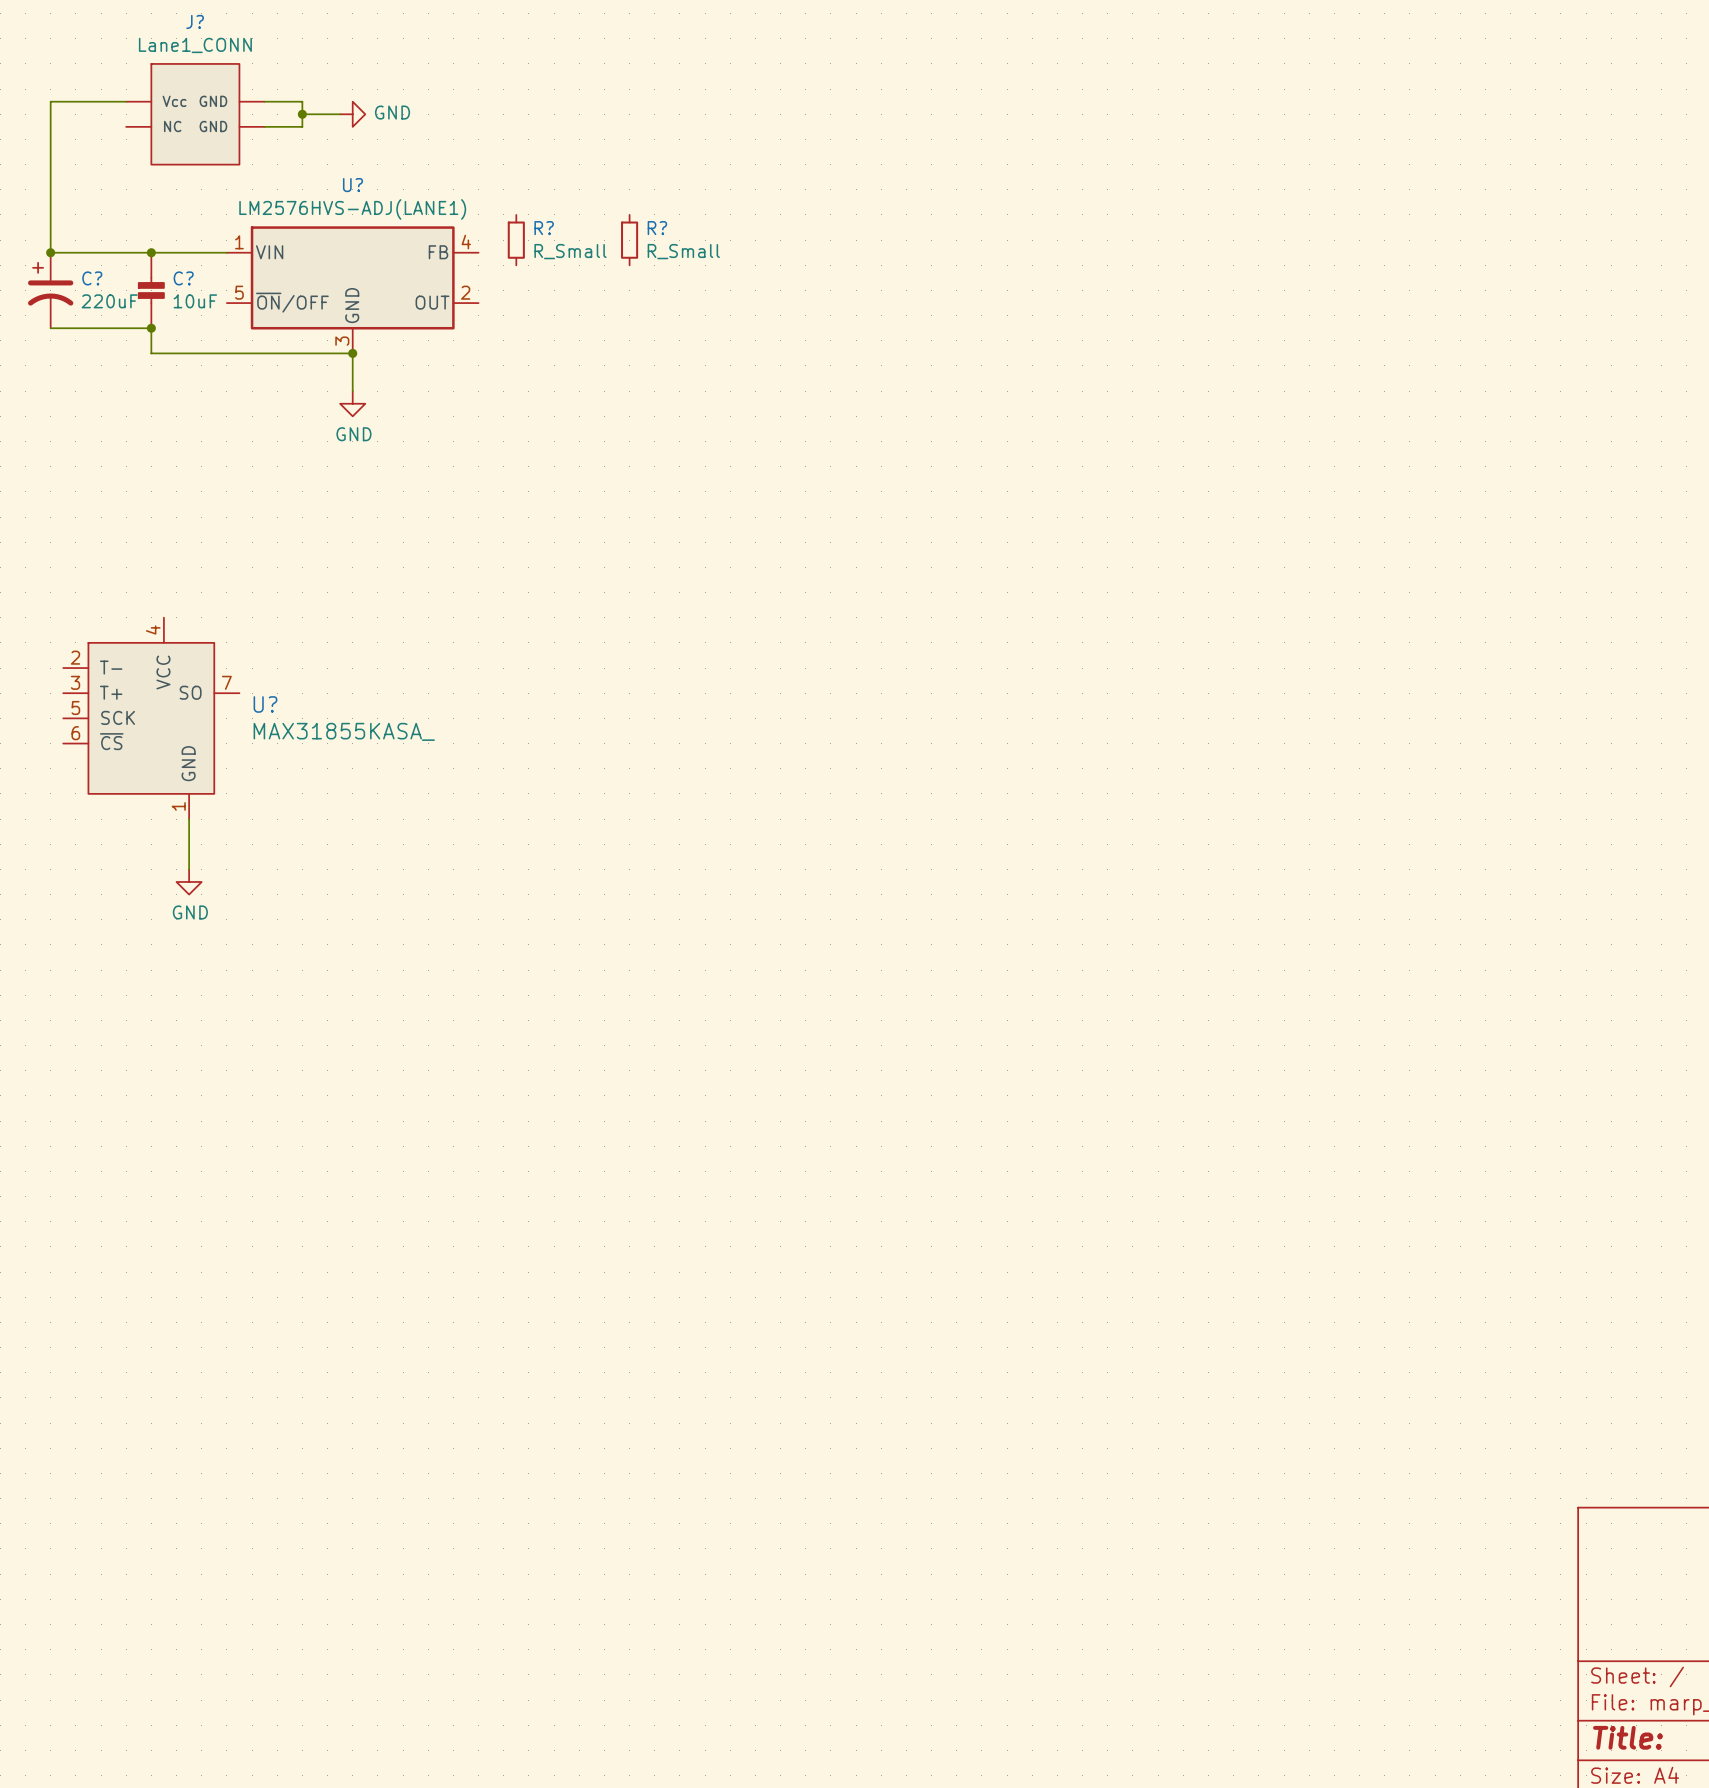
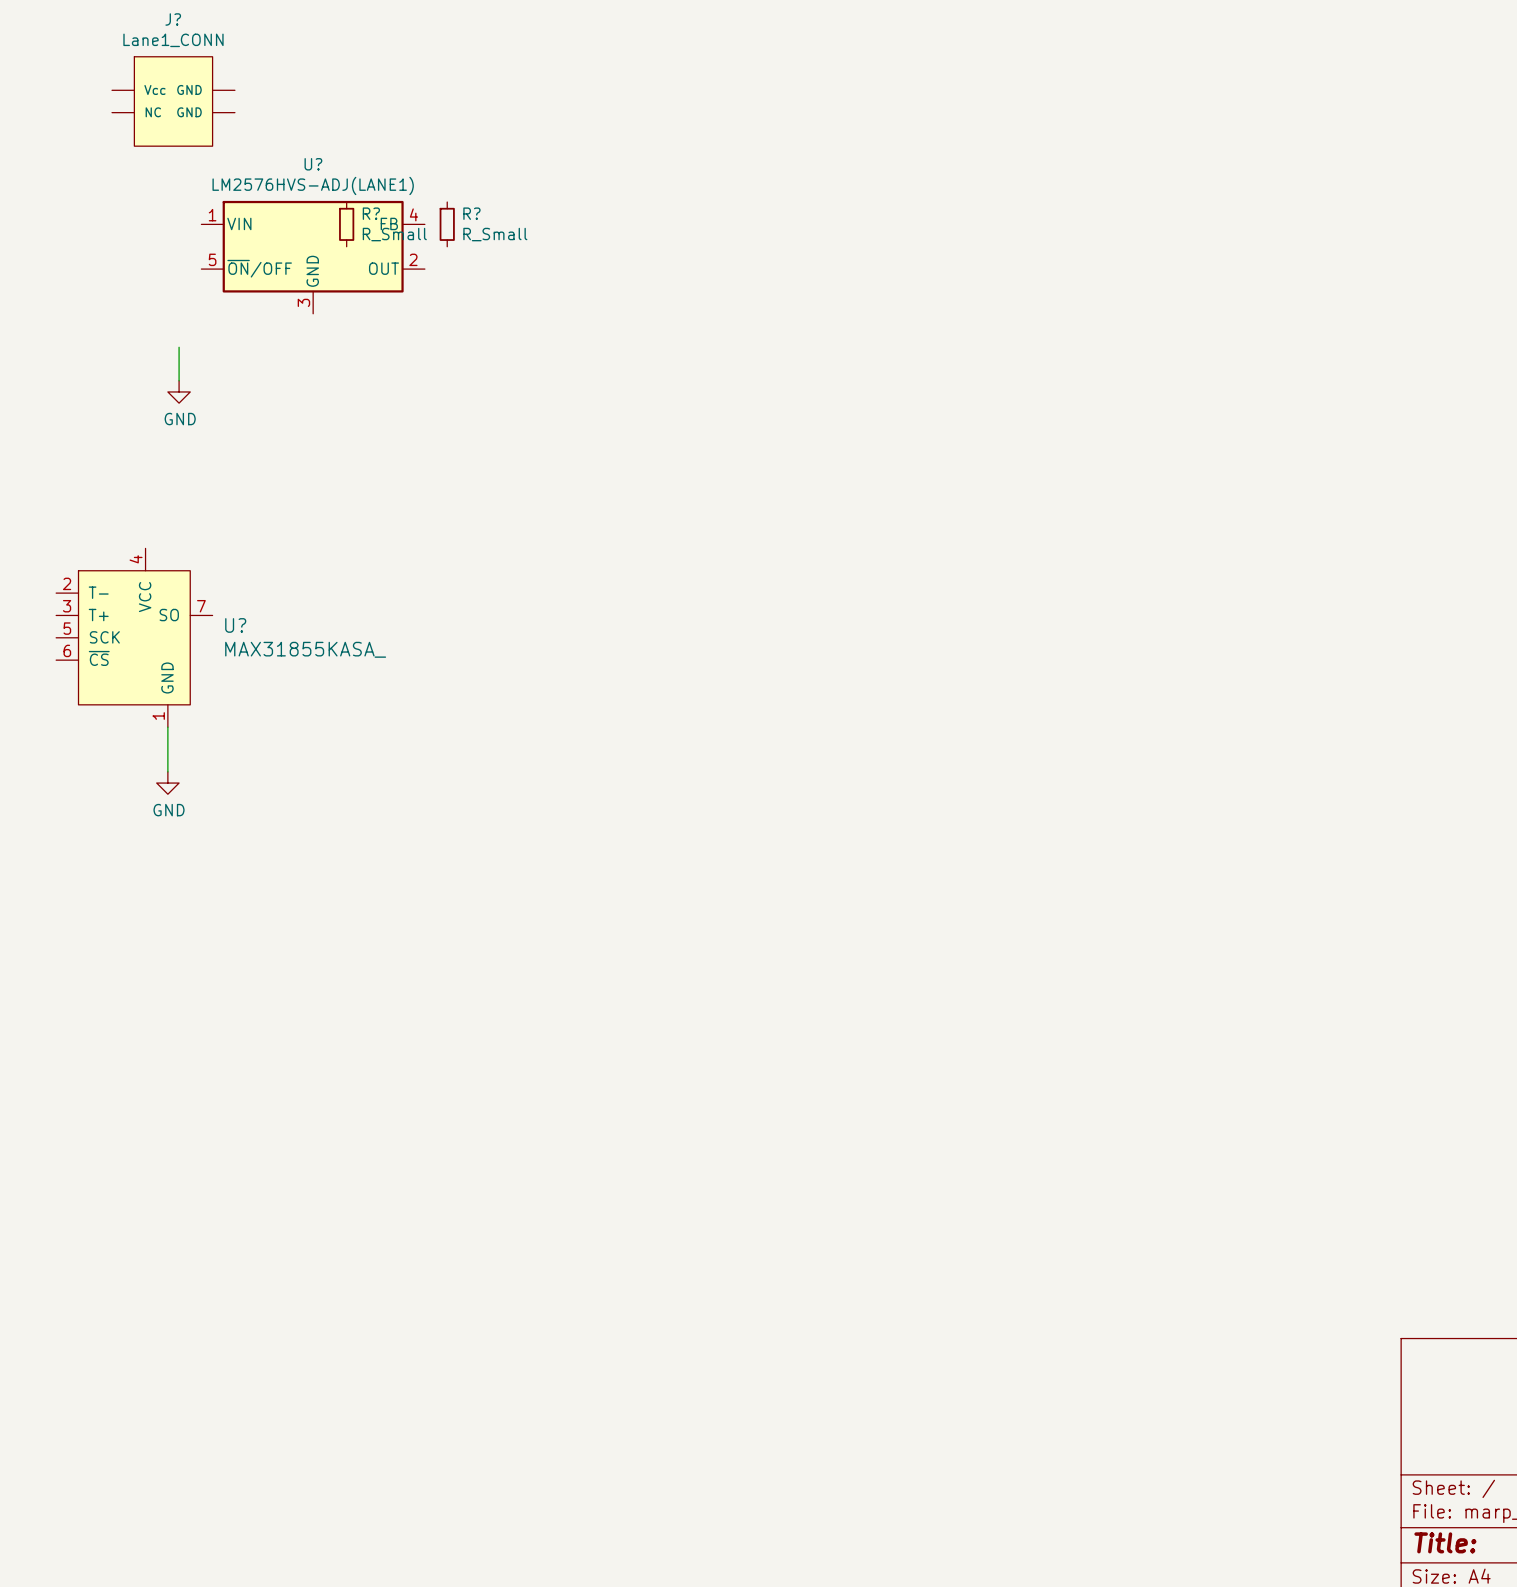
wire: (126, 101) (50, 101) (50, 252) (226, 252) -> none
wire: (264, 101) (302, 101) (302, 126) (264, 126) -> none
wire: (302, 114) (340, 114) -> none
junction: (302, 114) -> none
power symbol: GND (352, 114) -> none
R? position: (516, 240) -> (447, 224)
R?: R_Small (629, 240) -> none
junction: (50, 252) -> none
junction: (151, 252) -> none
R?: none -> R_Small (346, 224)
C?: 220uF (50, 290) -> none
C?: 10uF (151, 290) -> none
wire: (50, 328) (151, 328) (151, 353) (352, 353) (352, 391) -> none
junction: (151, 328) -> none
junction: (352, 353) -> none
wire: none -> (179, 347) (179, 380)
power symbol position: GND (352, 403) -> GND (179, 391)

